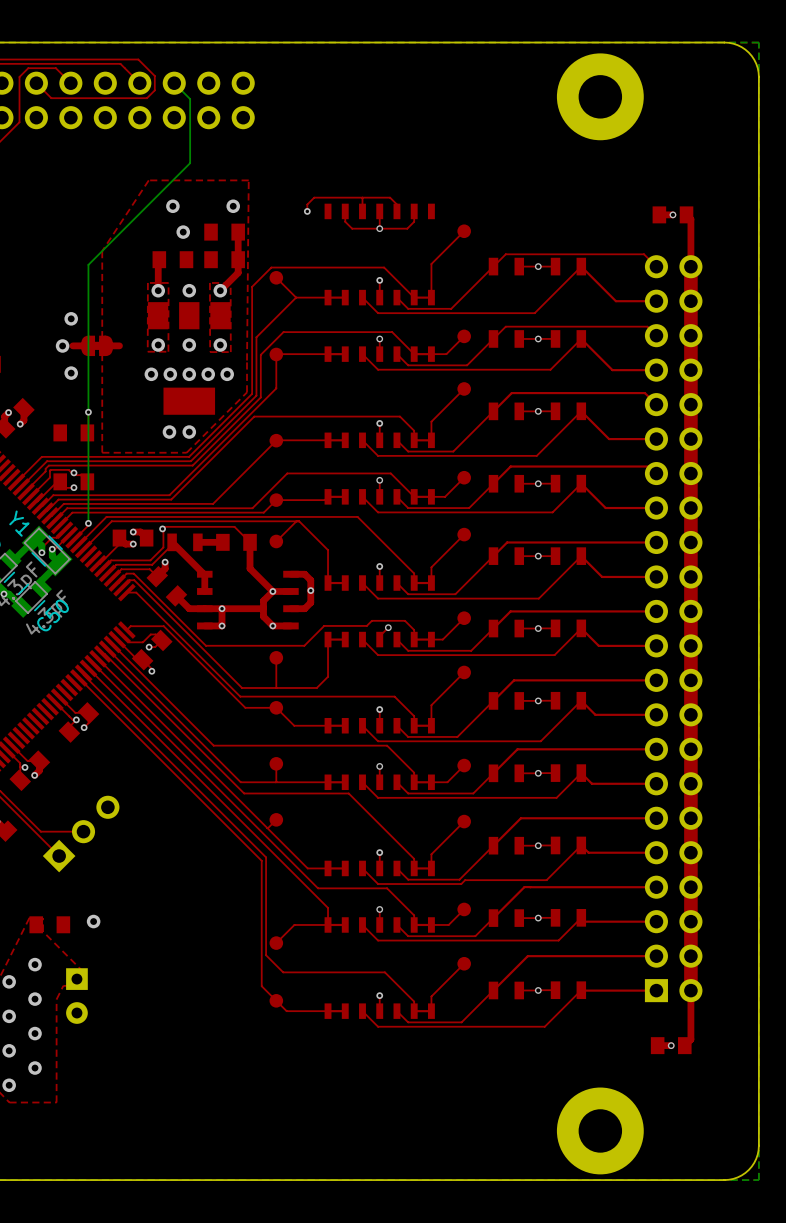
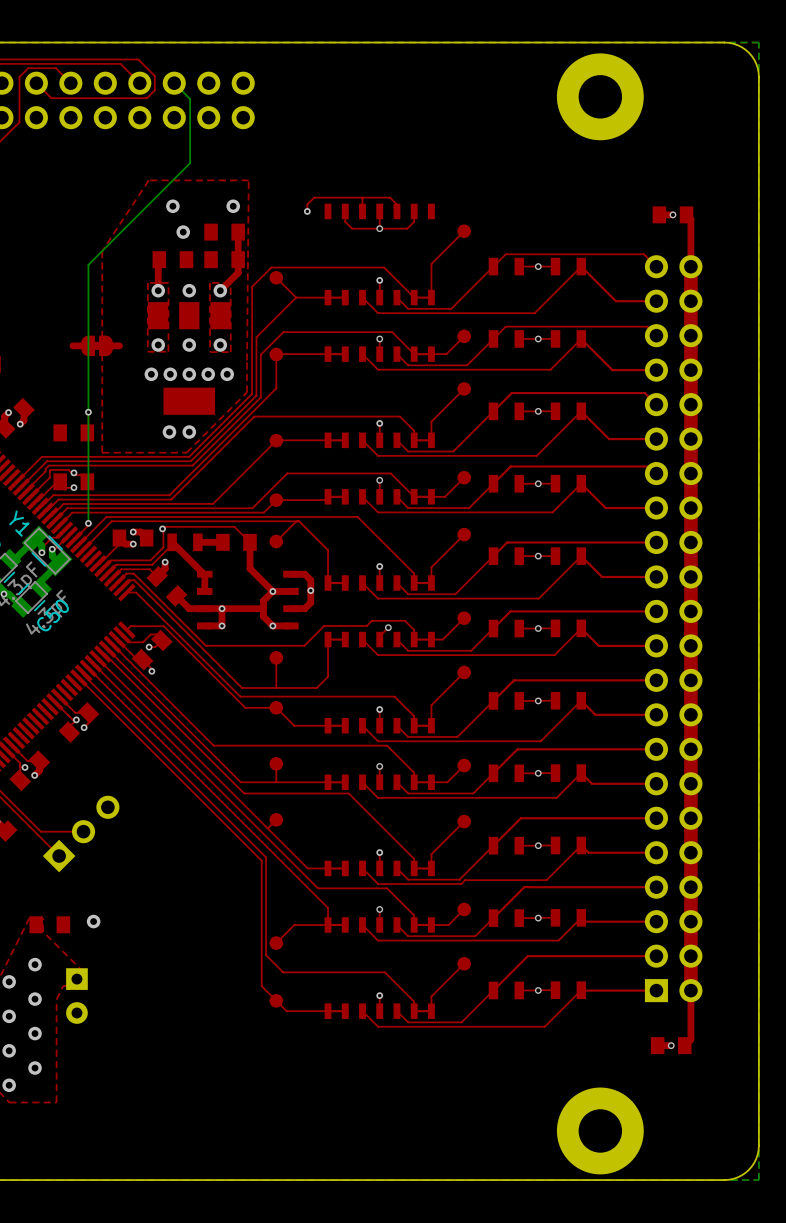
via: (71, 318) -> none
via: (62, 345) -> none
via: (71, 373) -> none

